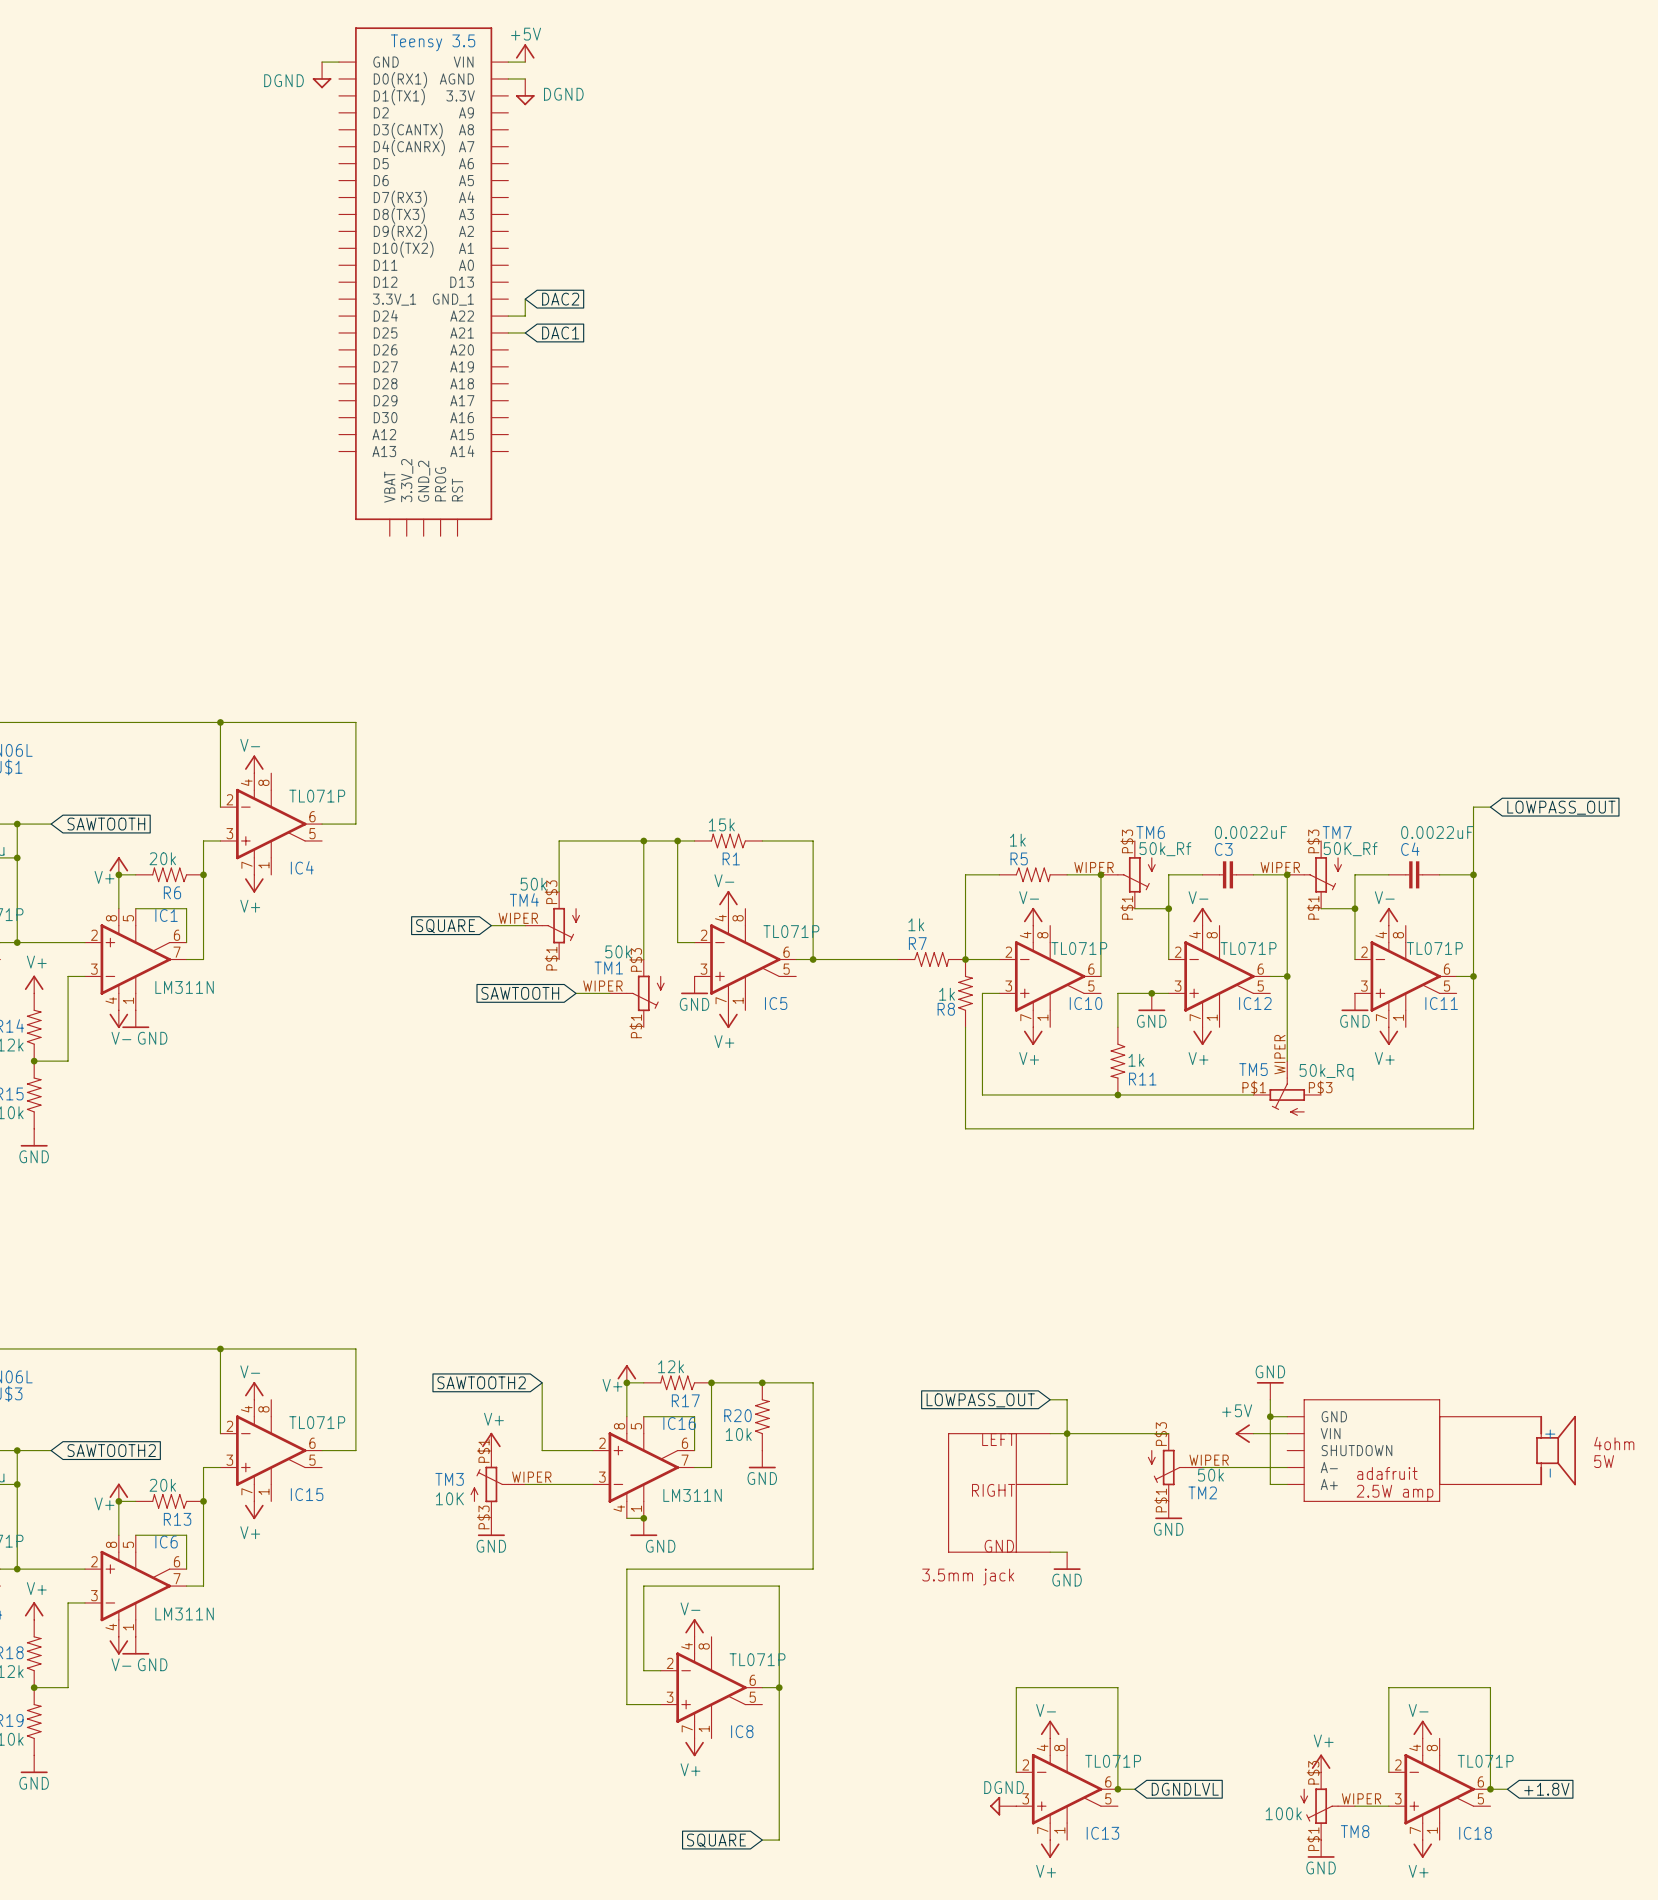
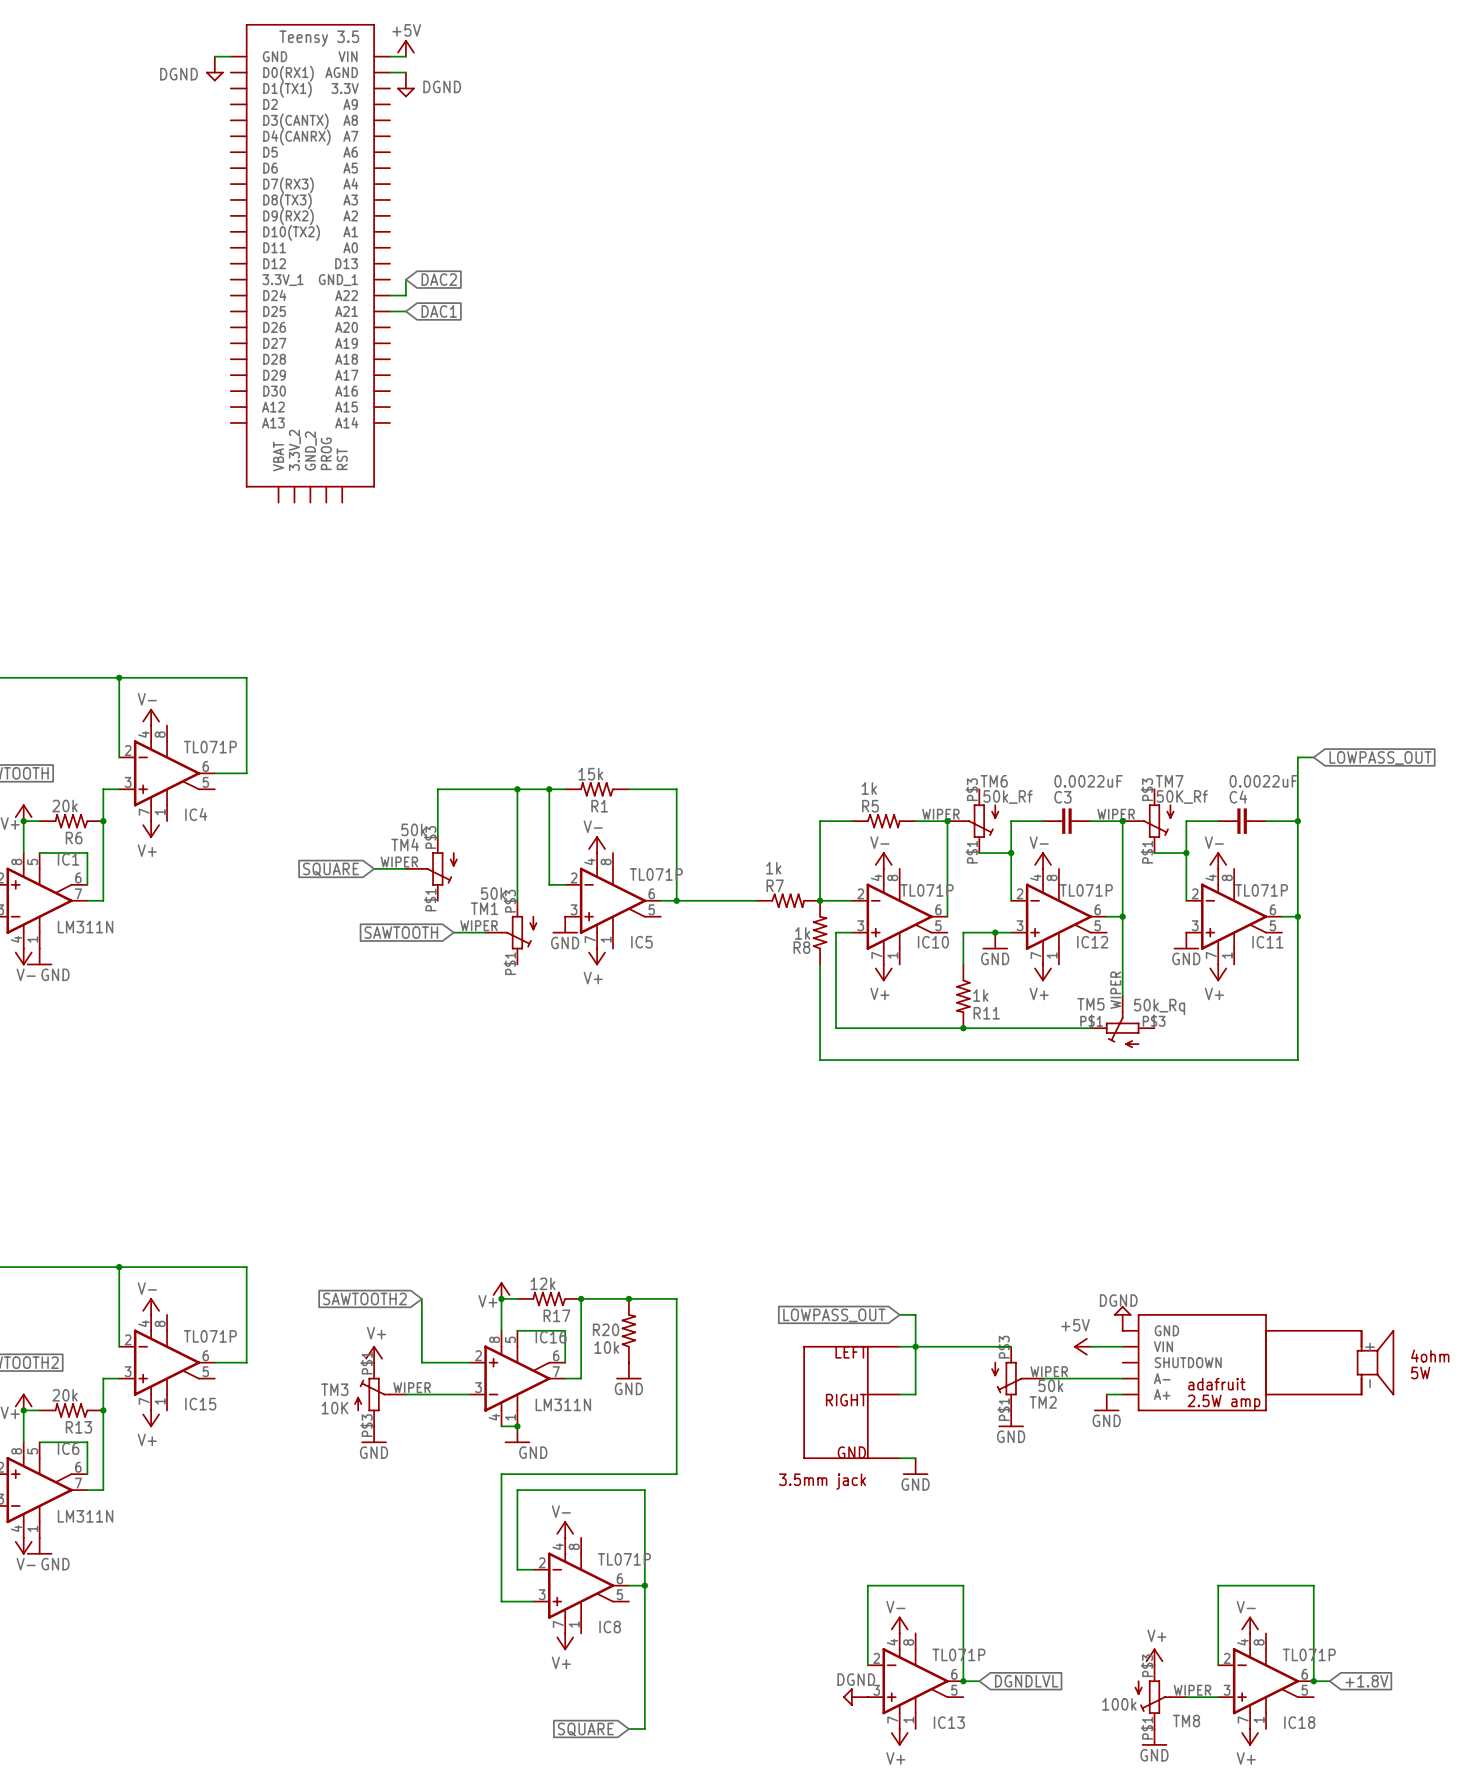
power symbol rotation: 0° (1270, 1382) -> 180° (1106, 1410)
power symbol position: GND (1270, 1390) -> GND (1106, 1402)
wire: (1270, 1399) (1270, 1484) -> none
power symbol: none -> DGND (1122, 1318)
wire: (1270, 1416) (1287, 1416) -> none
junction: (1270, 1416) -> none

